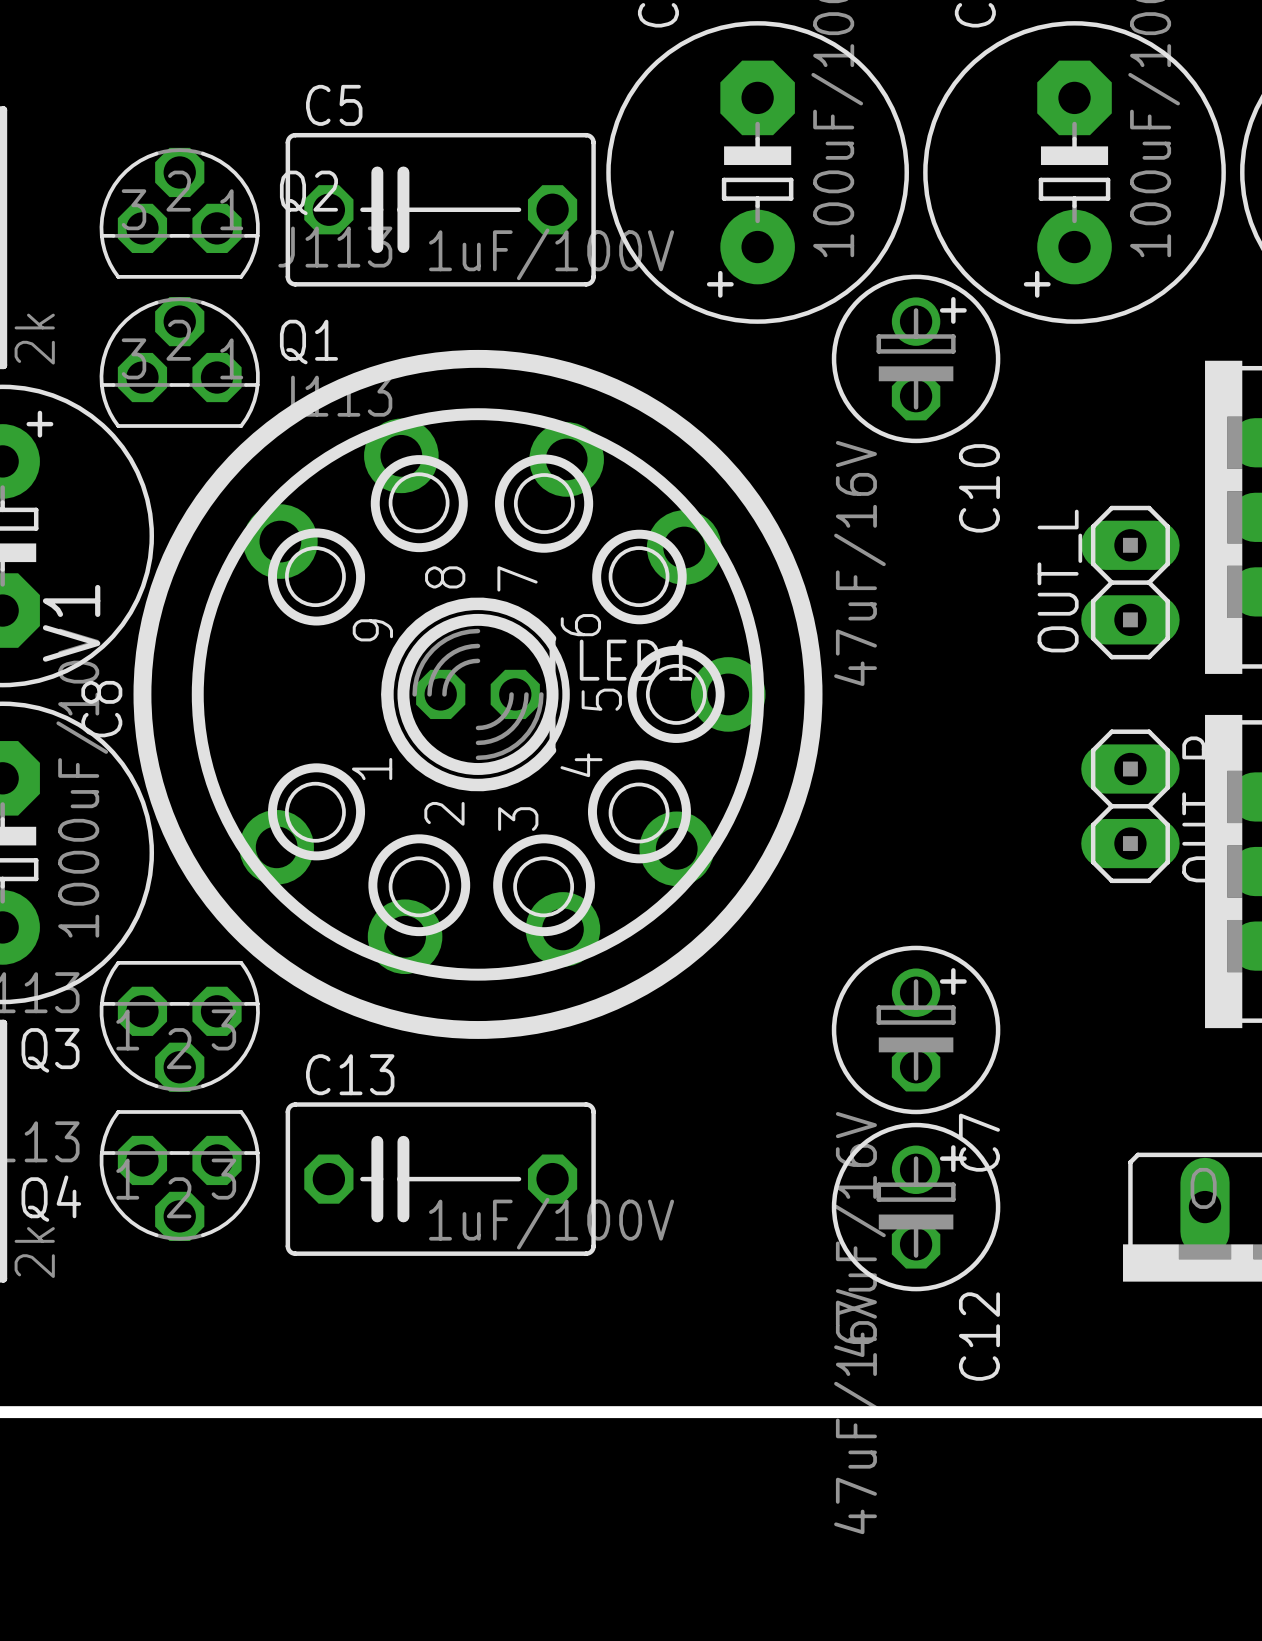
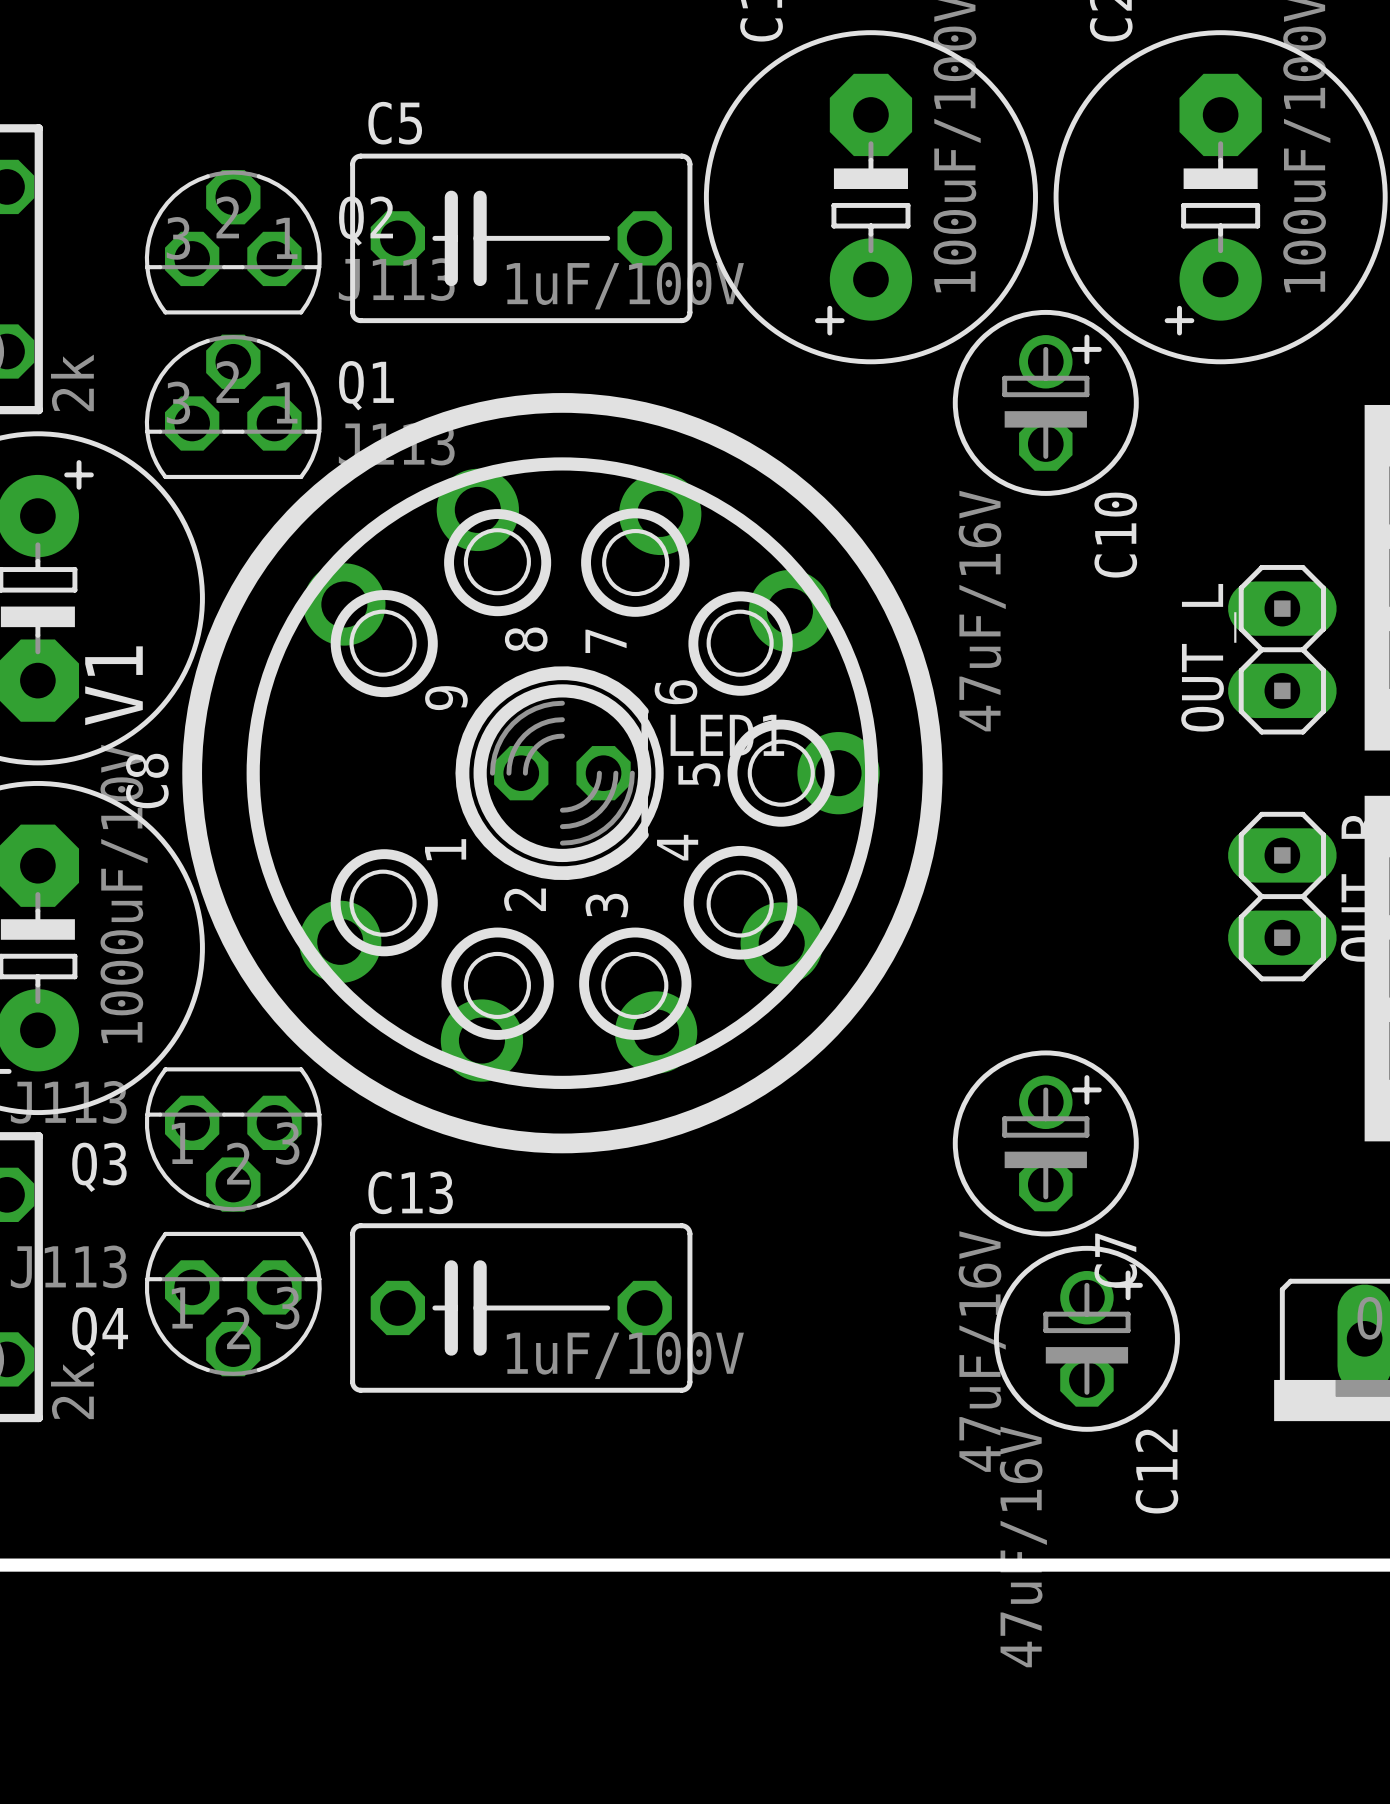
C12 position: (916, 1207) -> (1086, 1338)

